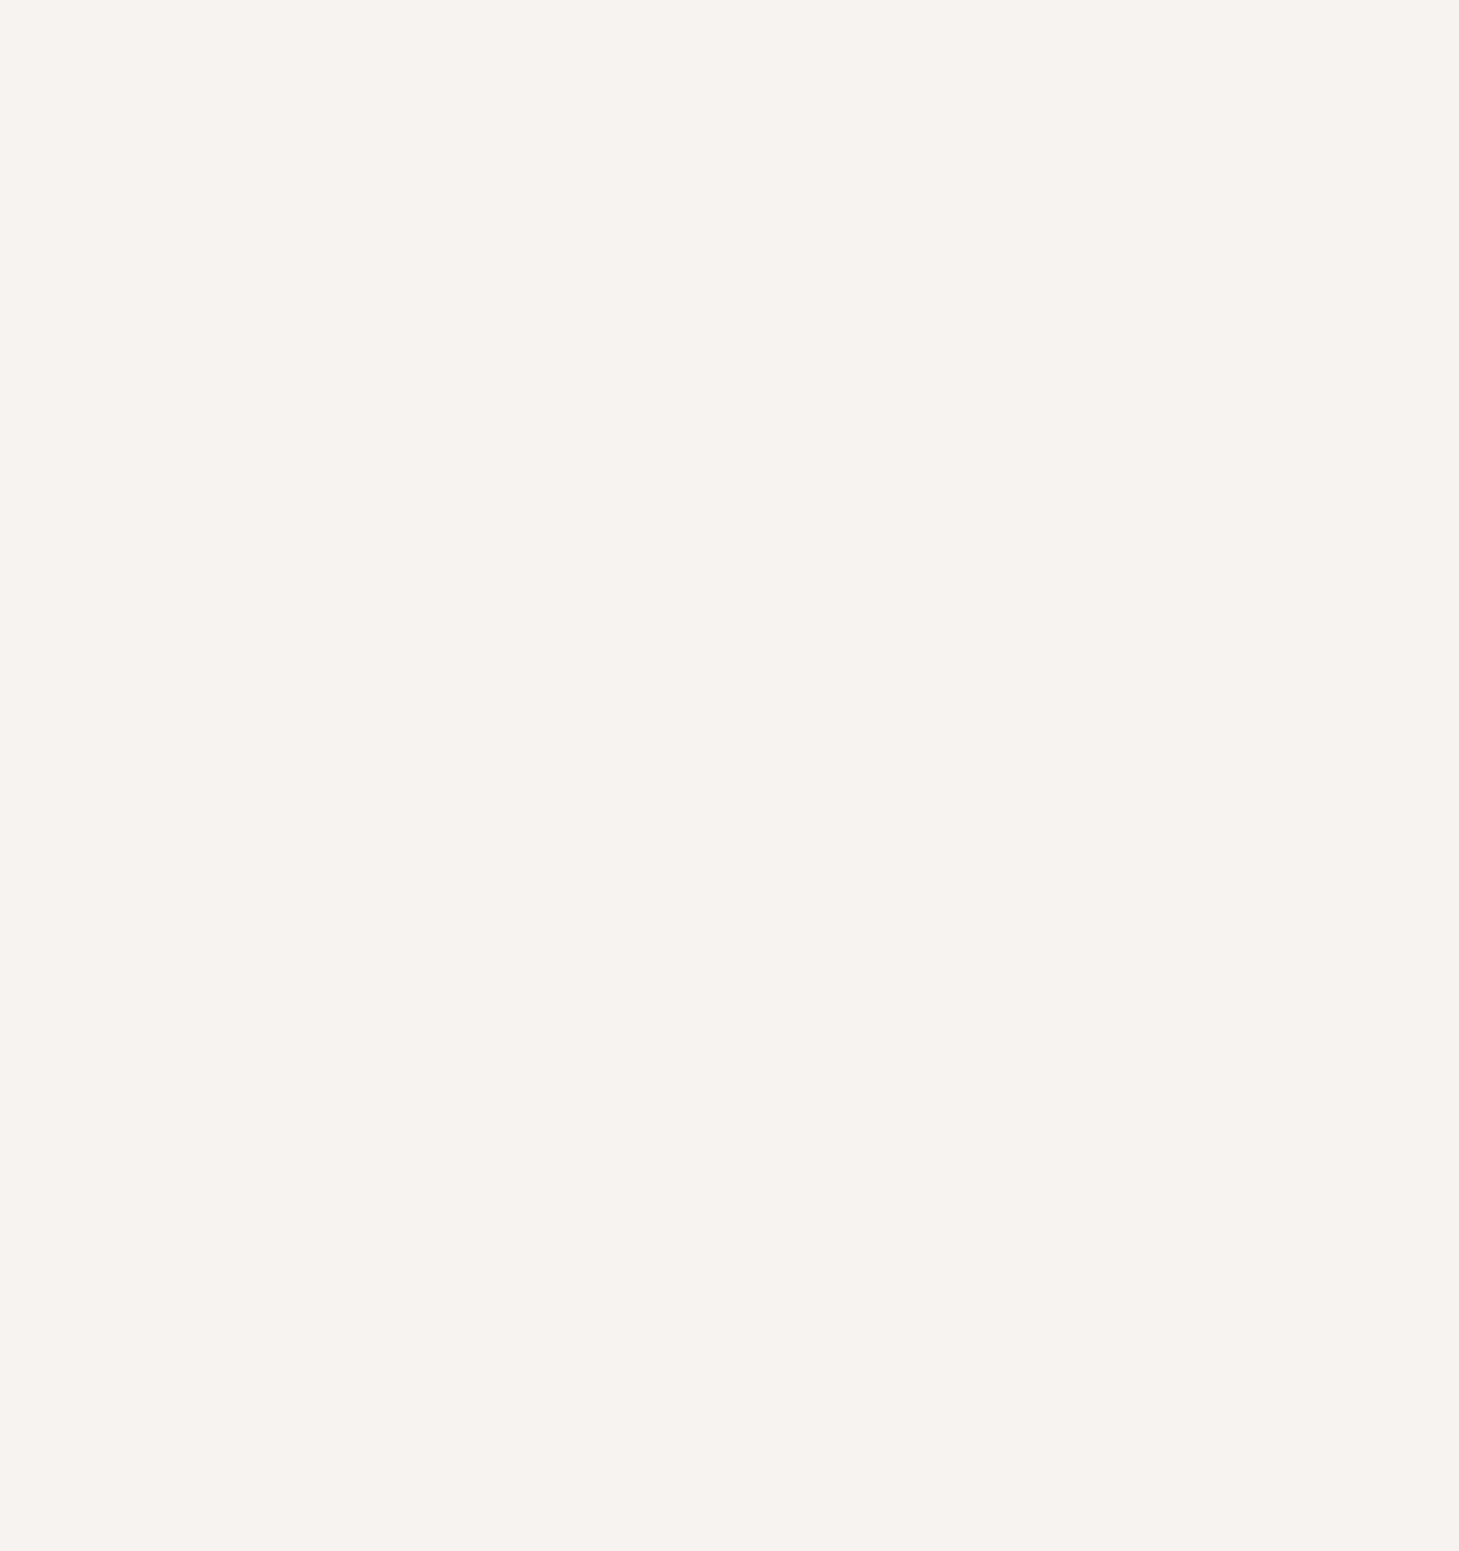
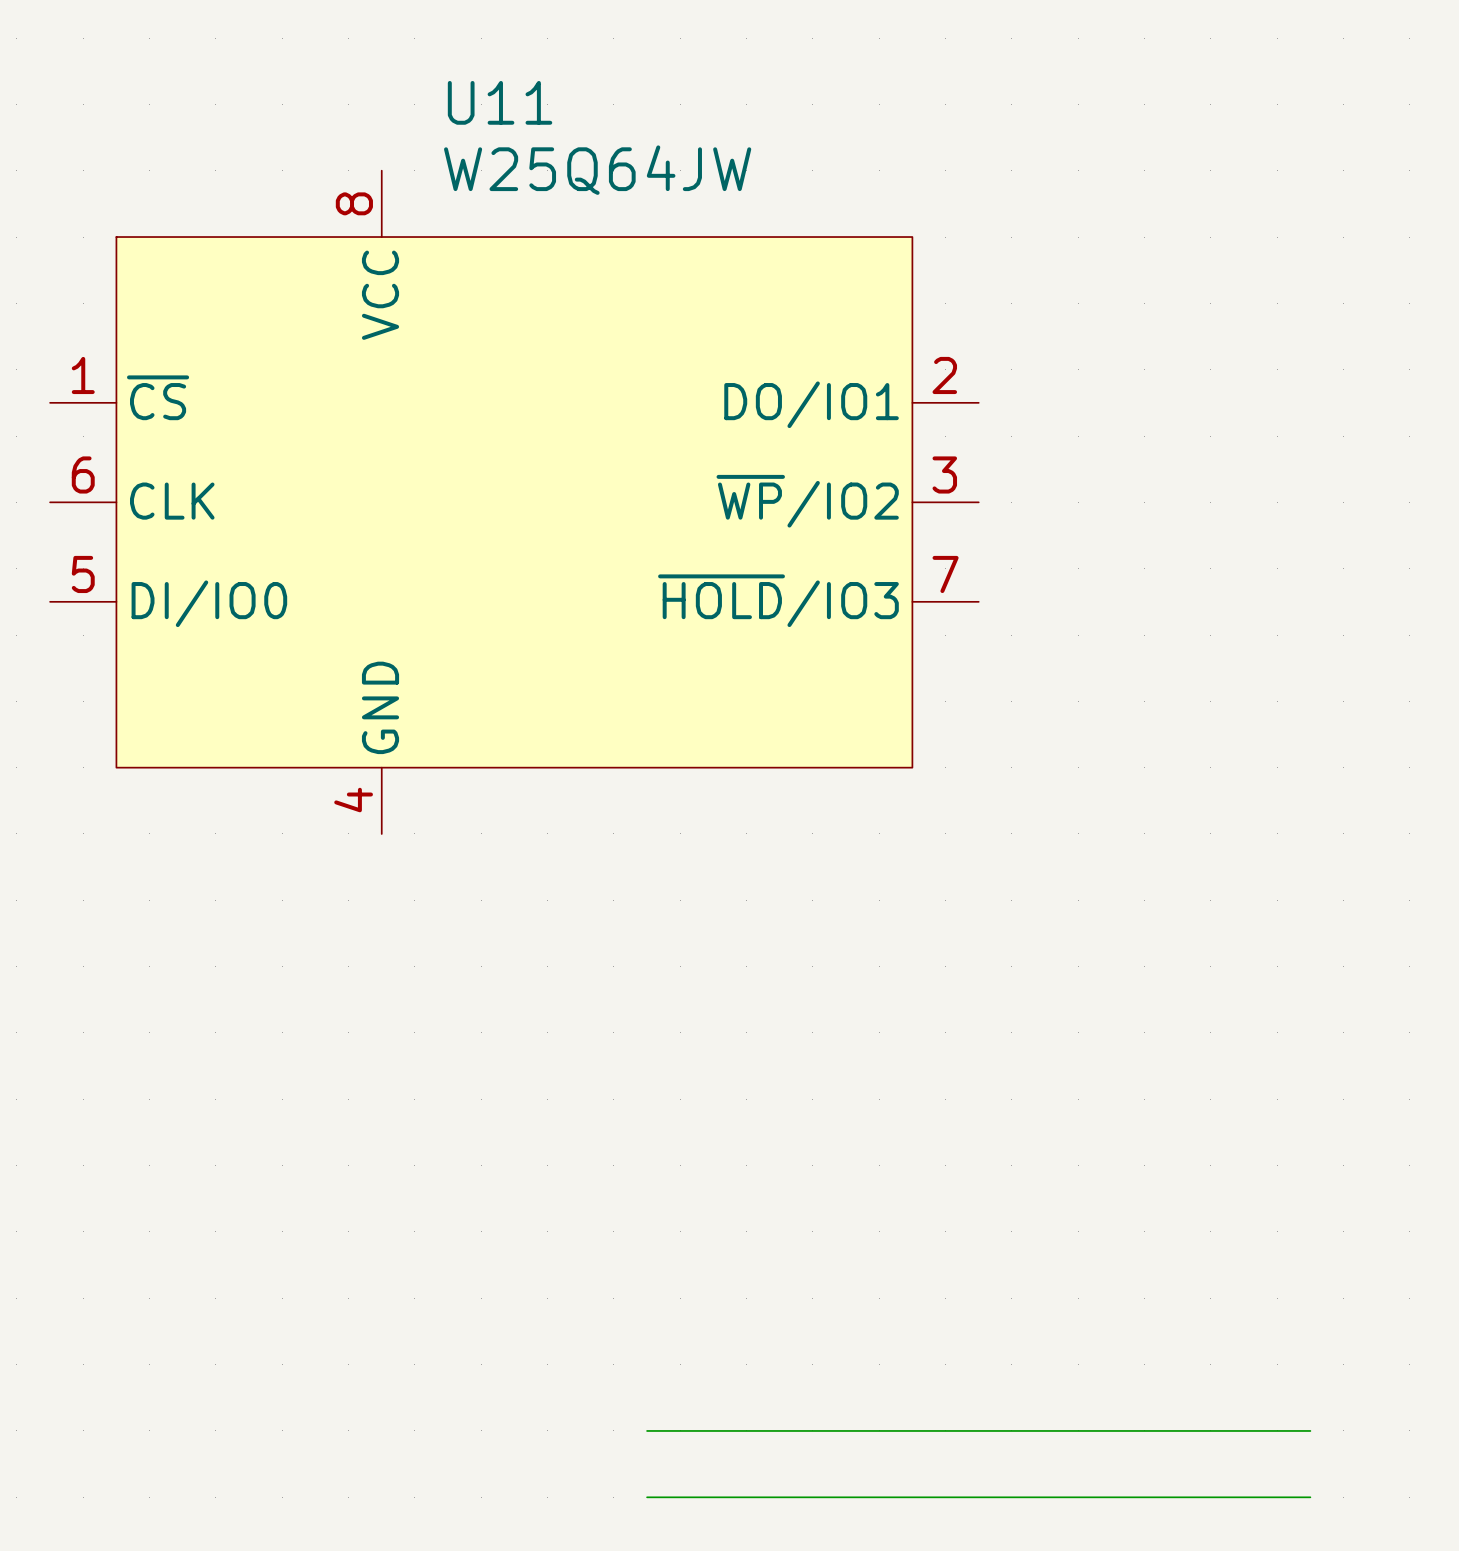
U11: none -> W25Q64JW (514, 502)
wire: none -> (647, 1430) (1310, 1430)
wire: none -> (647, 1497) (1310, 1497)

